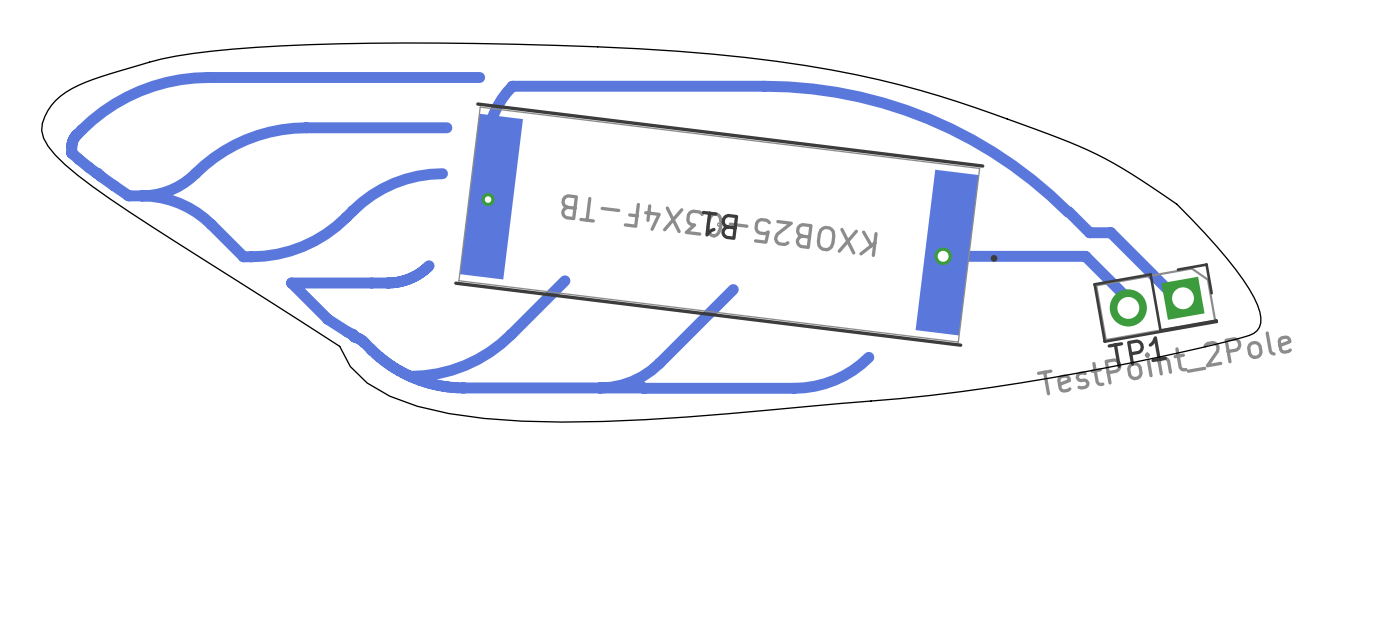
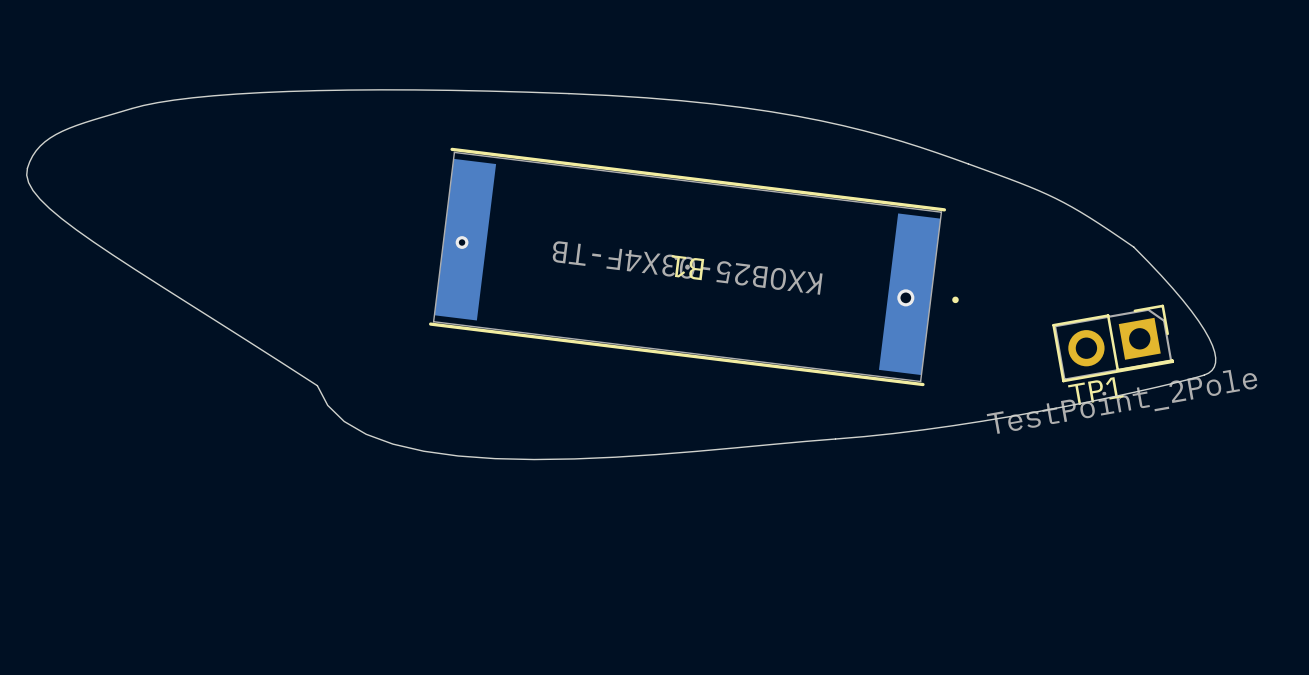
track: (479, 77) (208, 77) (180, 79) (139, 91) (103, 111) (75, 136) (72, 142) (71, 152) -> none
track: (446, 127) (306, 127) (269, 132) (246, 139) (224, 150) (177, 186) (163, 192) (141, 195) -> none
track: (71, 153) (100, 175) -> none
track: (442, 173) (417, 176) (394, 183) (372, 195) (336, 226) (314, 240) (290, 250) (264, 256) (243, 256) (204, 218) (188, 207) (170, 200) (141, 195) -> none
track: (100, 176) (128, 195) (141, 195) -> none
track: (488, 199) (488, 130) (497, 106) (512, 86) (764, 86) (836, 92) (883, 103) (928, 118) (992, 152) (1032, 179) (1089, 232) (1110, 232) (1176, 298) (1183, 298) -> none
track: (943, 256) (1085, 256) (1127, 298) (1120, 298) -> none
track: (429, 265) (414, 276) (395, 282) (291, 283) (328, 319) (362, 340) (391, 365) (424, 381) (462, 387) (643, 387) -> none
track: (564, 280) (511, 334) (489, 352) (451, 370) (410, 376) -> none
track: (733, 289) (651, 370) (632, 381) (599, 387) -> none
track: (868, 357) (852, 370) (834, 380) (804, 387) (644, 388) -> none

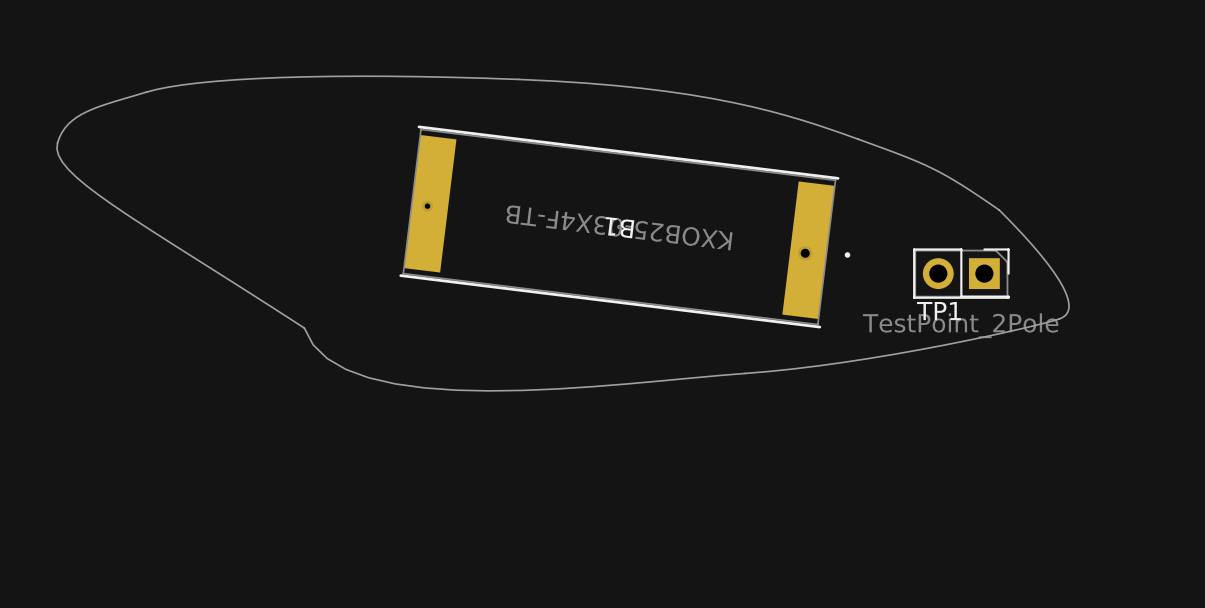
TP1 rotation: 0° (1113, 343) -> 10° clockwise (961, 273)

